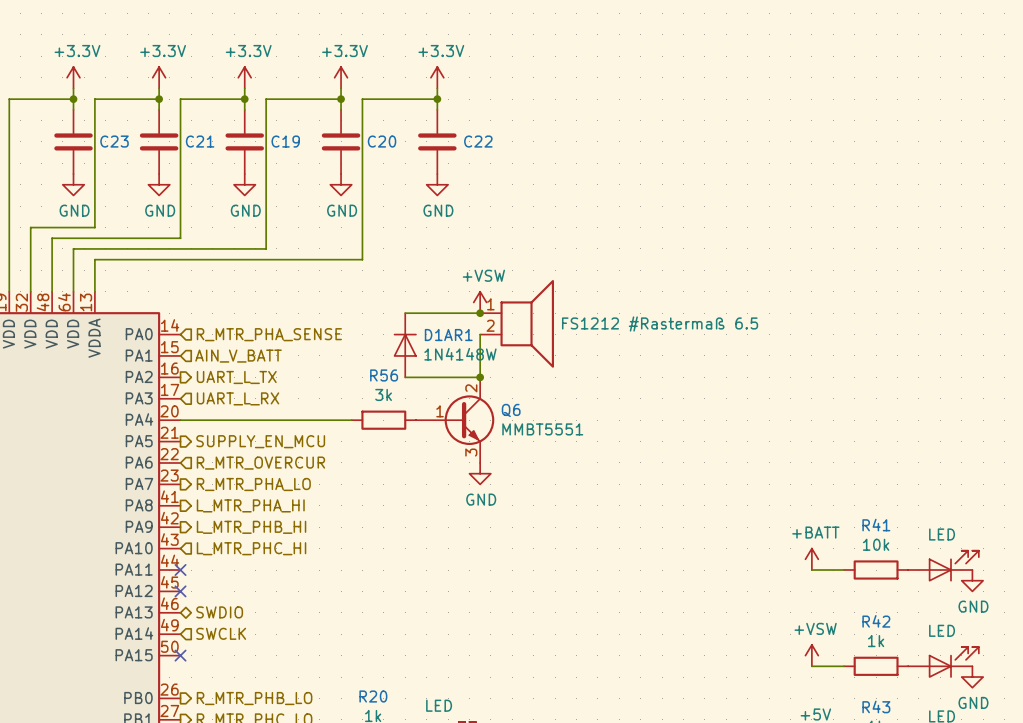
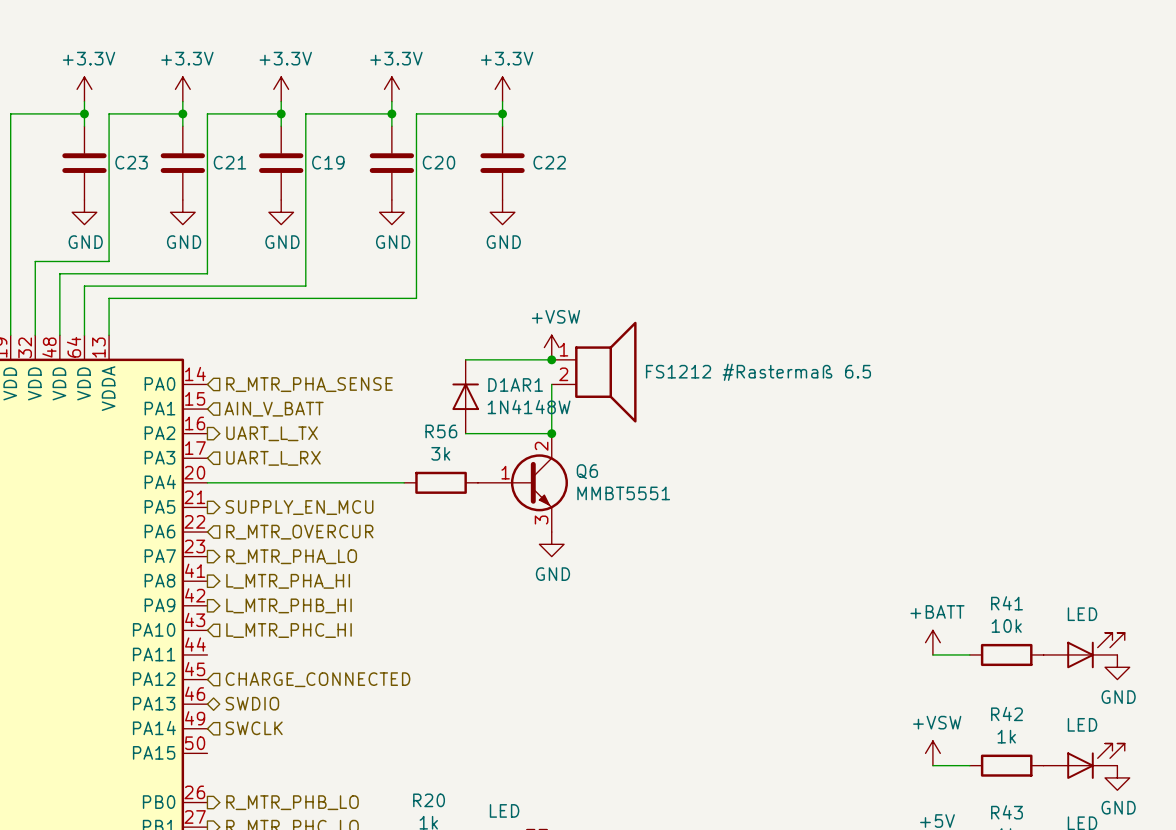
no-connect mark: (180, 570) -> none
no-connect mark: (180, 591) -> none
hierarchical label: none -> CHARGE_CONNECTED (318, 679)
no-connect mark: (180, 655) -> none

